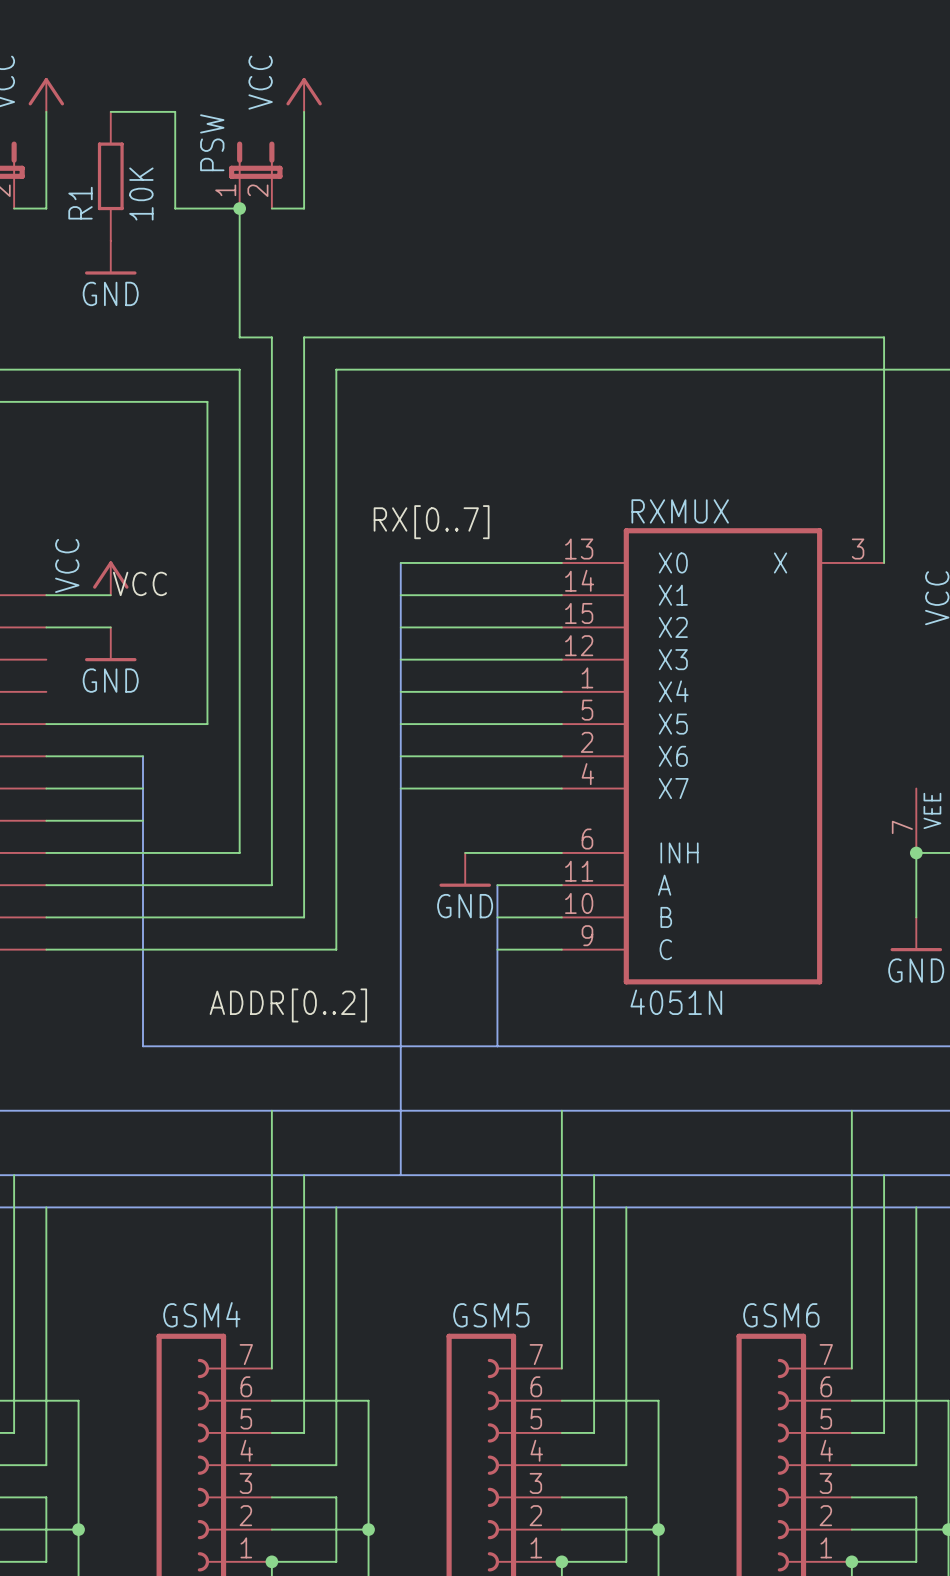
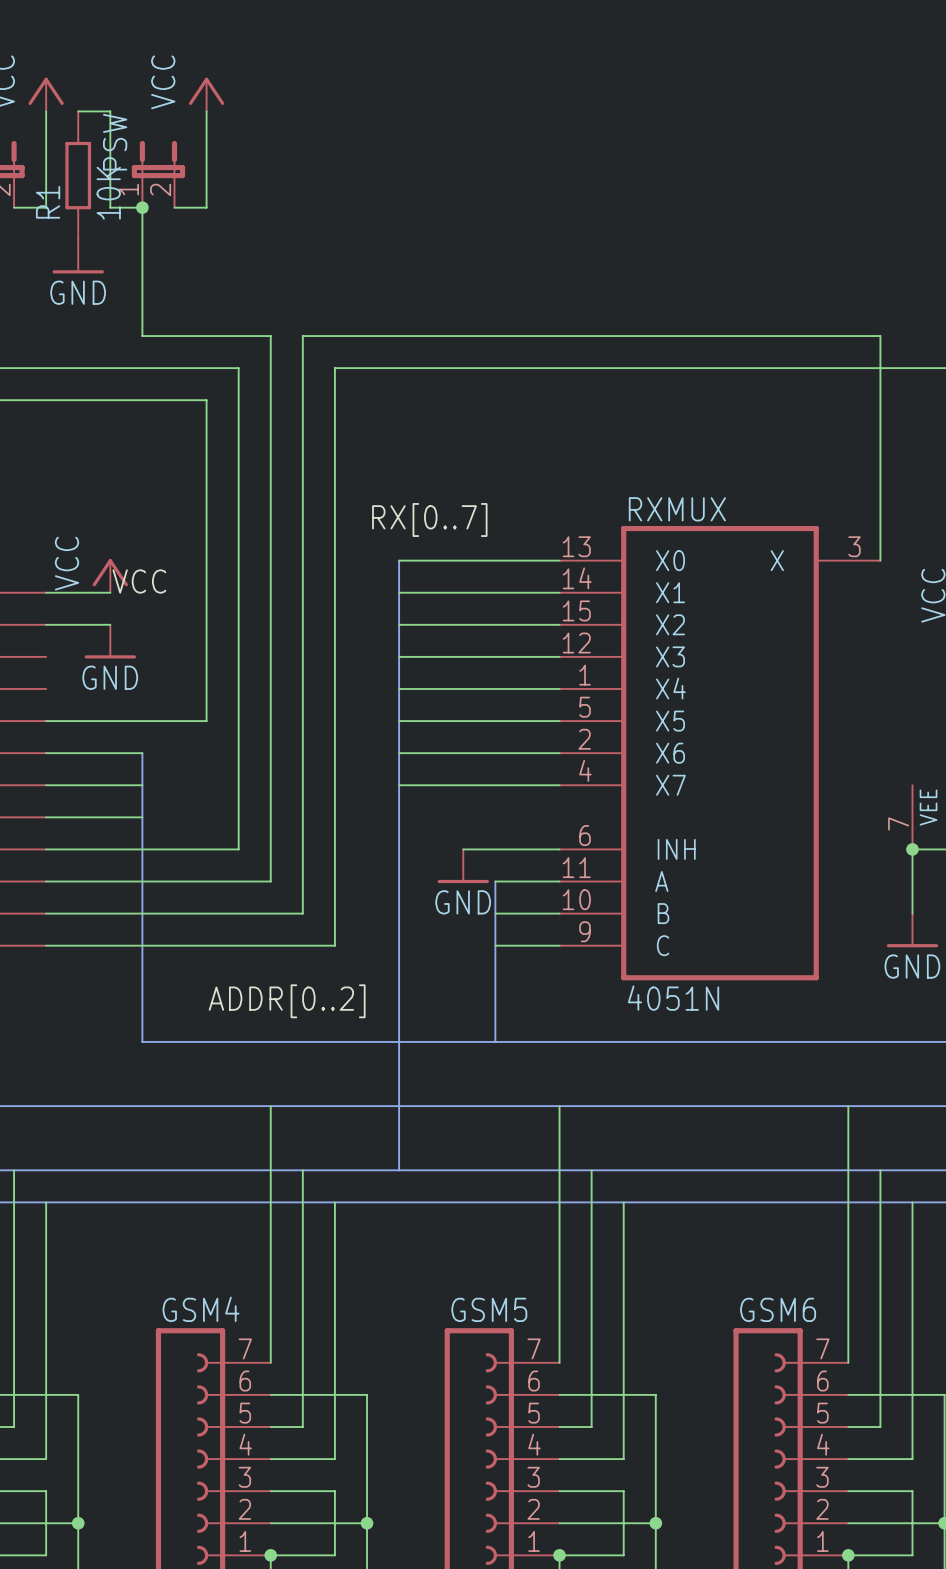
power symbol position: VCC (304, 94) -> VCC (206, 94)
wire: (110, 111) (175, 111) (175, 208) -> none
wire: none -> (206, 111) (206, 207)
wire: (304, 111) (304, 208) (271, 208) -> none
PSW position: (255, 175) -> (158, 174)
R1 position: (110, 176) -> (78, 175)
junction: none -> (142, 207)
wire: (207, 208) (239, 208) (239, 337) -> (78, 111) (110, 111) (110, 207) (142, 207) (142, 336) (238, 336)
junction: (239, 208) -> none
power symbol position: GND (110, 257) -> GND (78, 256)

